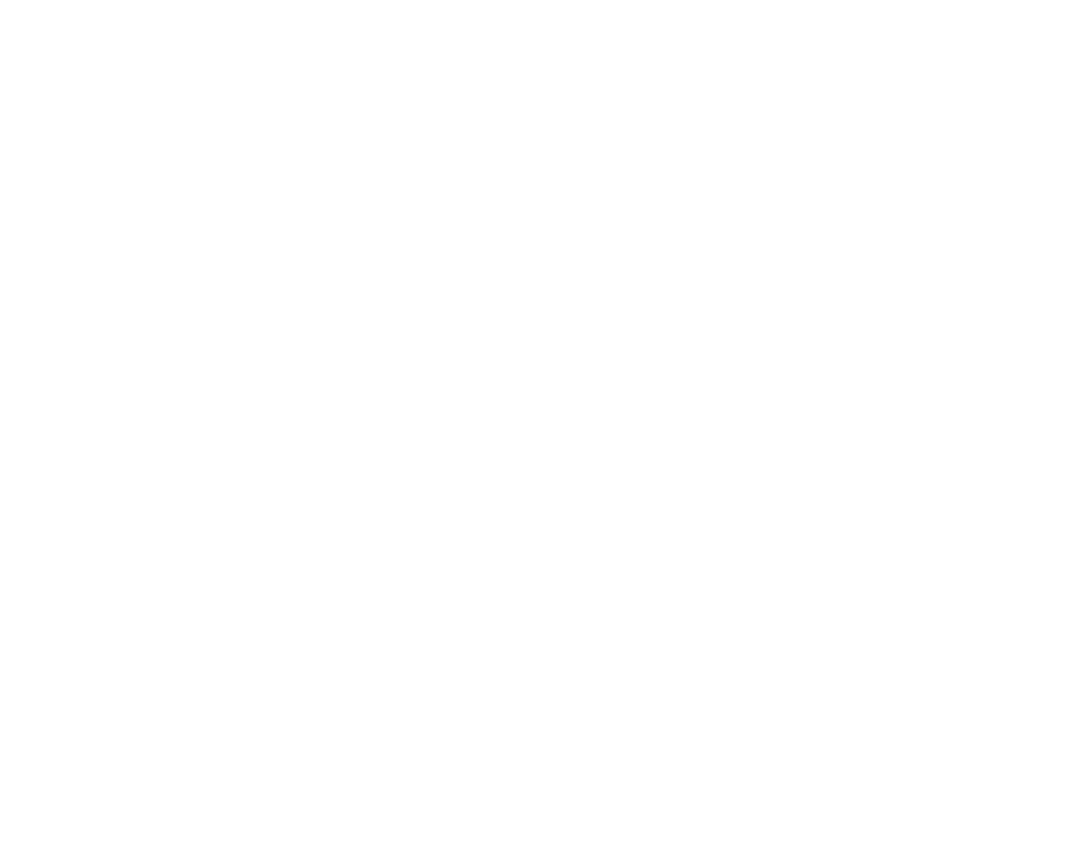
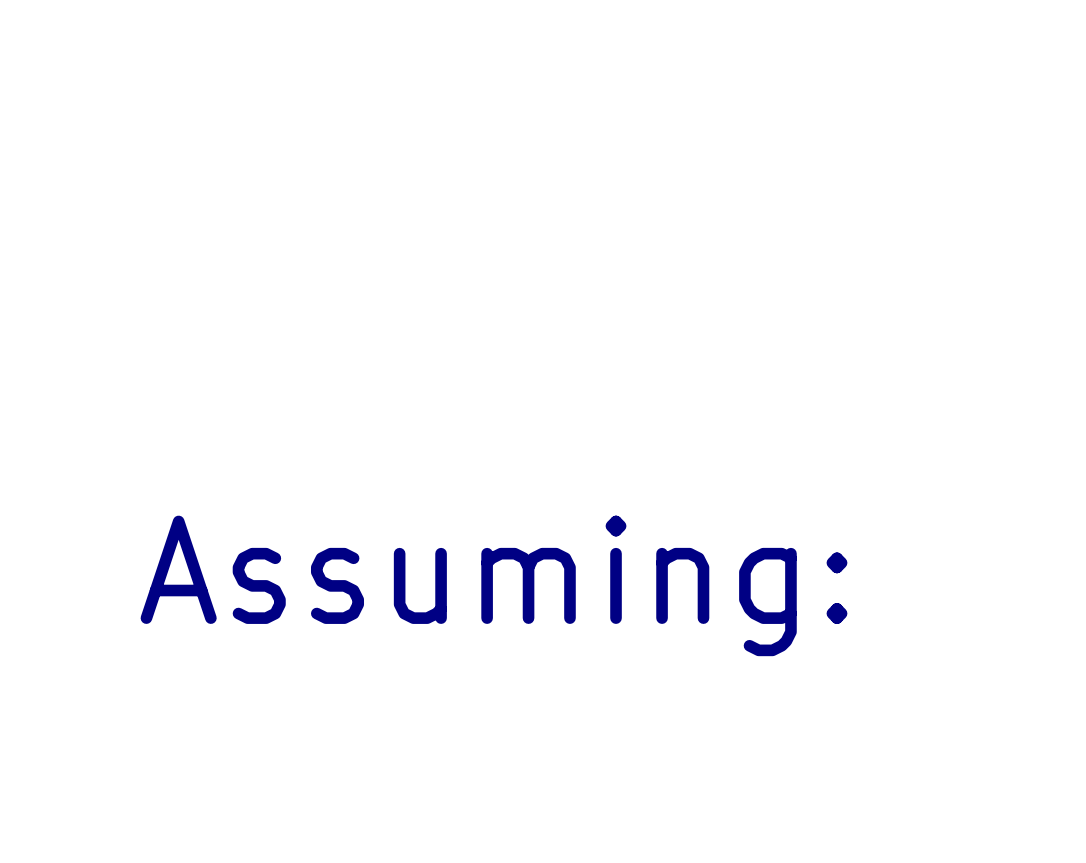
text: none -> Assuming: (494, 585)

